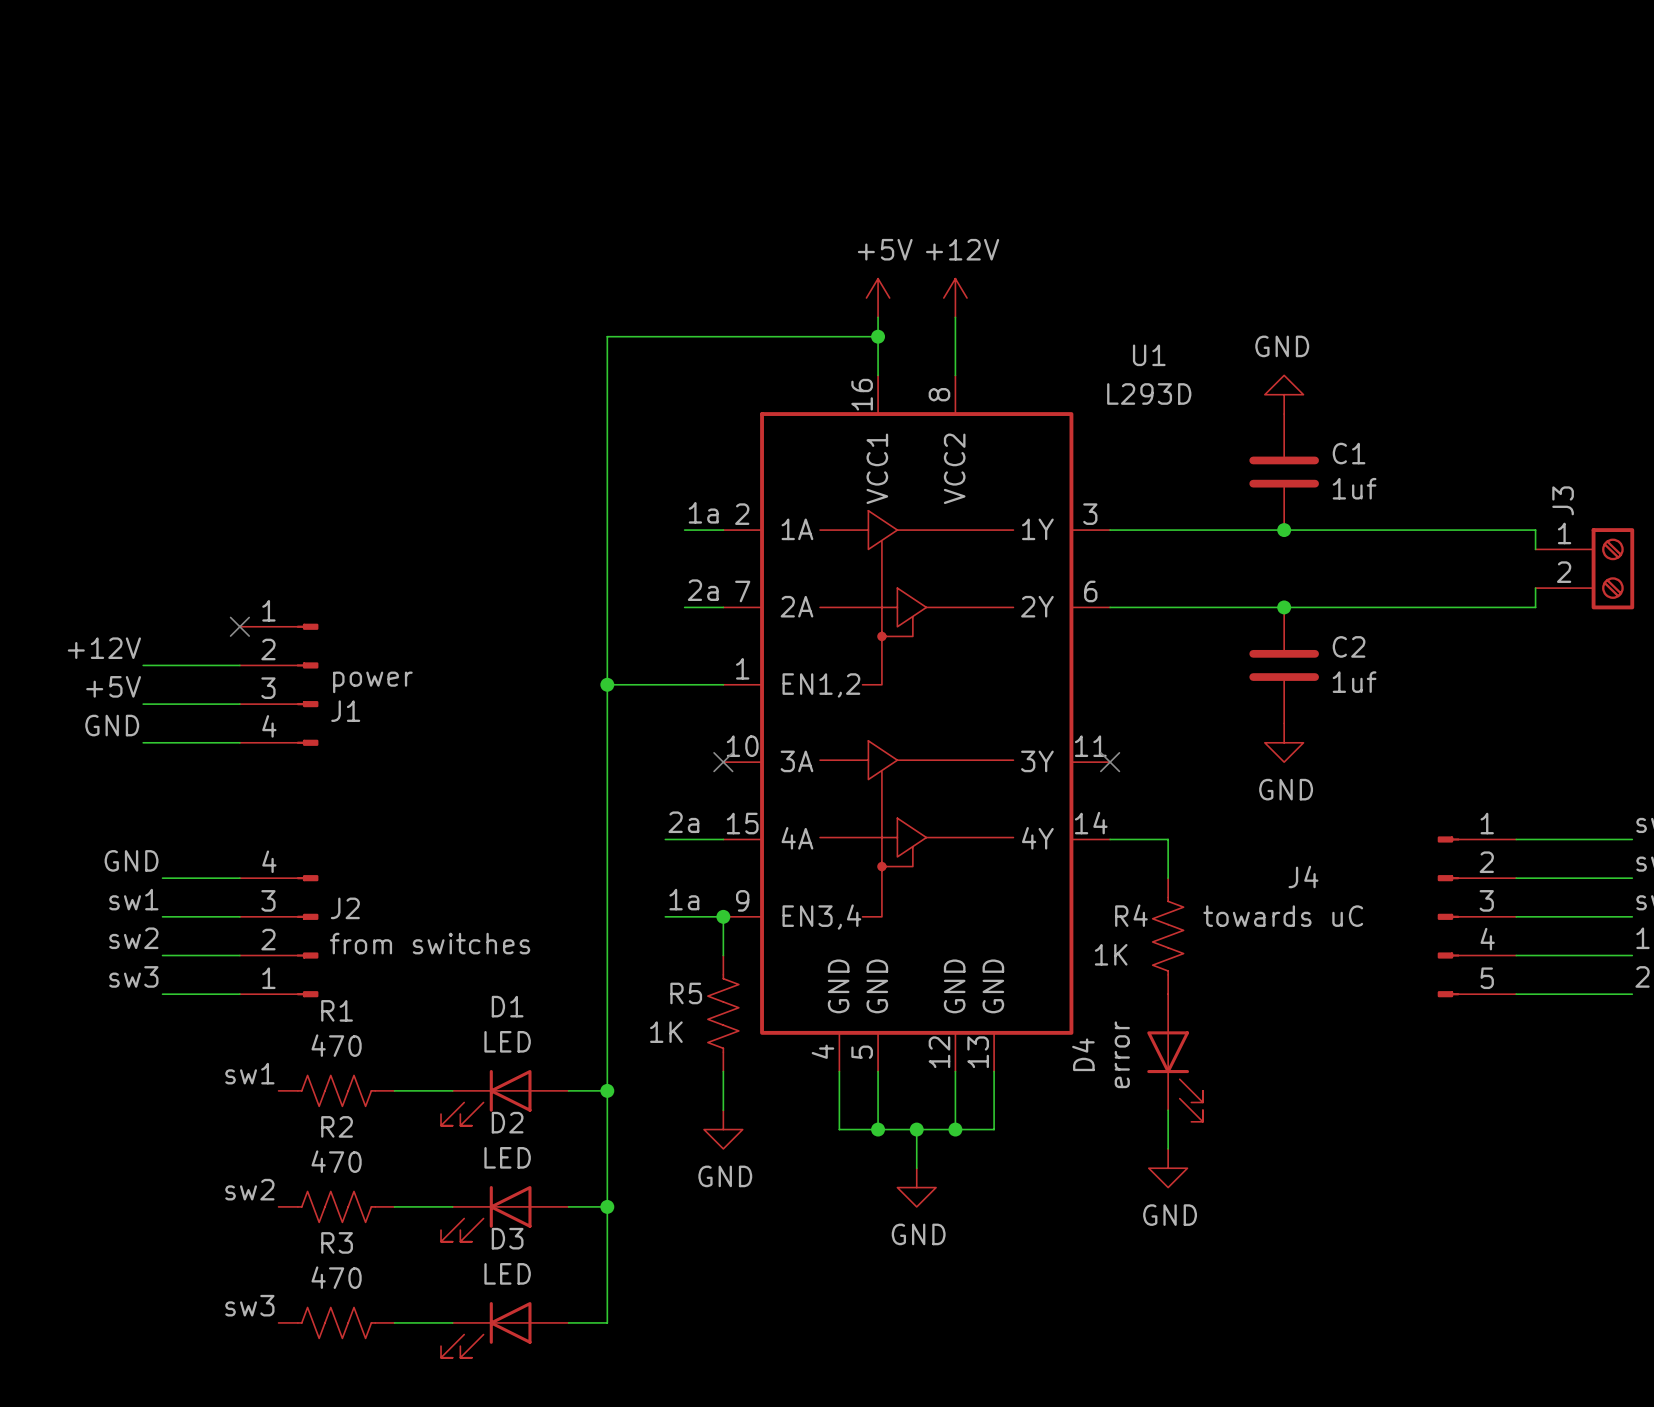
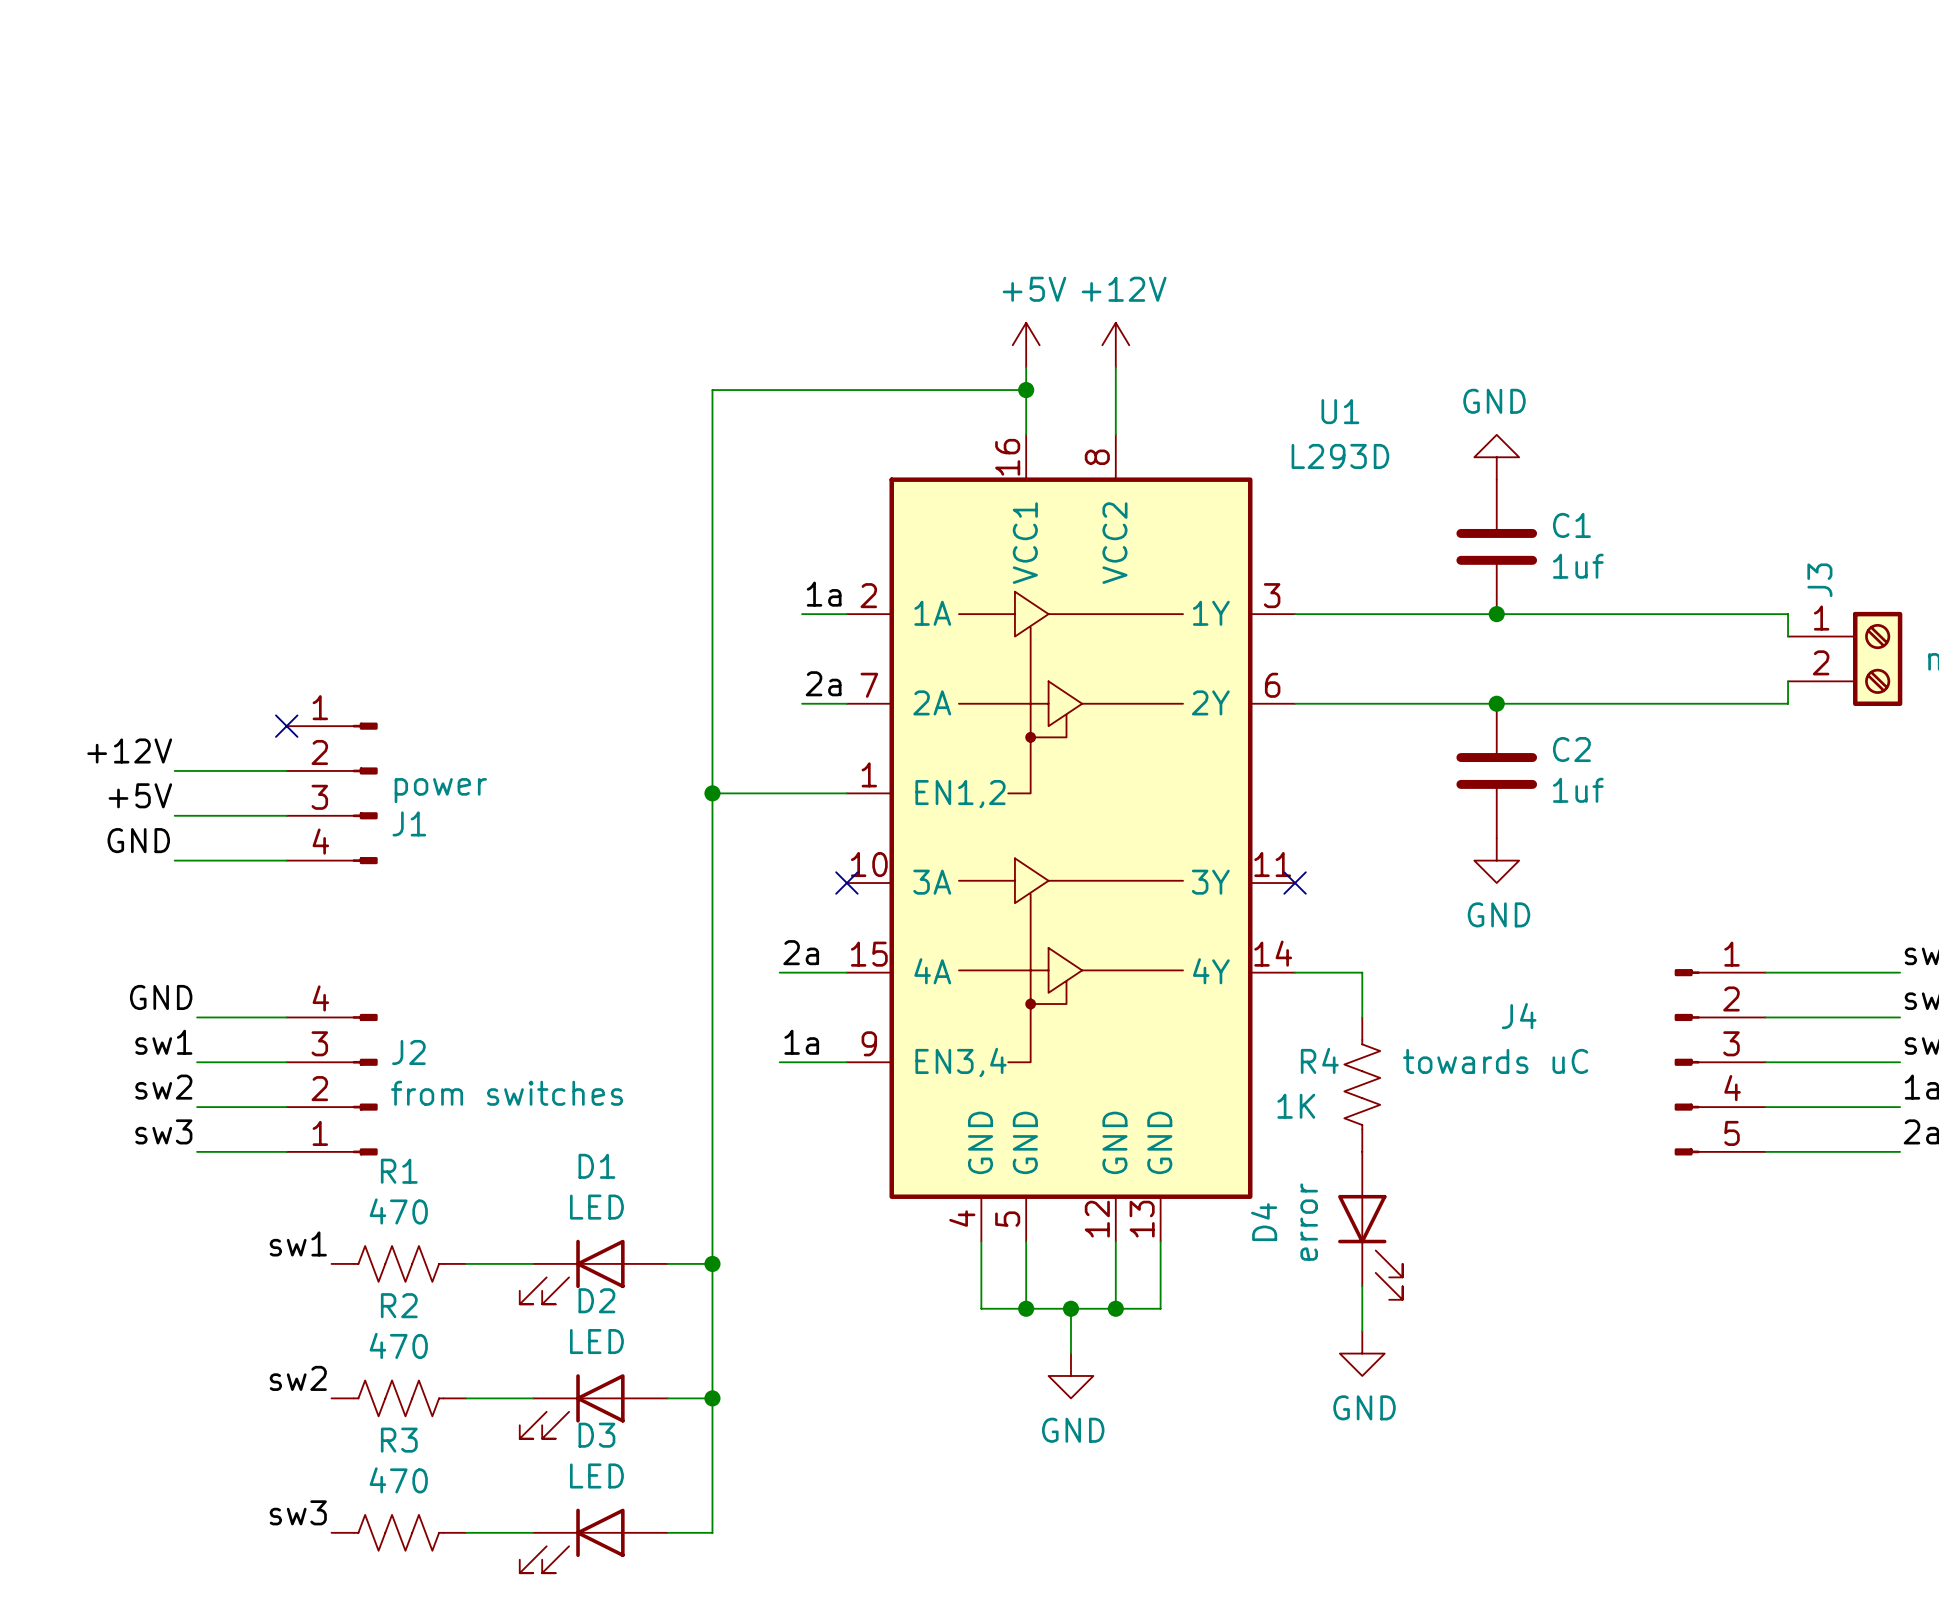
wire: (723, 916) (723, 955) -> none
junction: (723, 916) -> none
R5: 1K (723, 1013) -> none
wire: (723, 1071) (723, 1110) -> none
power symbol: GND (723, 1129) -> none

